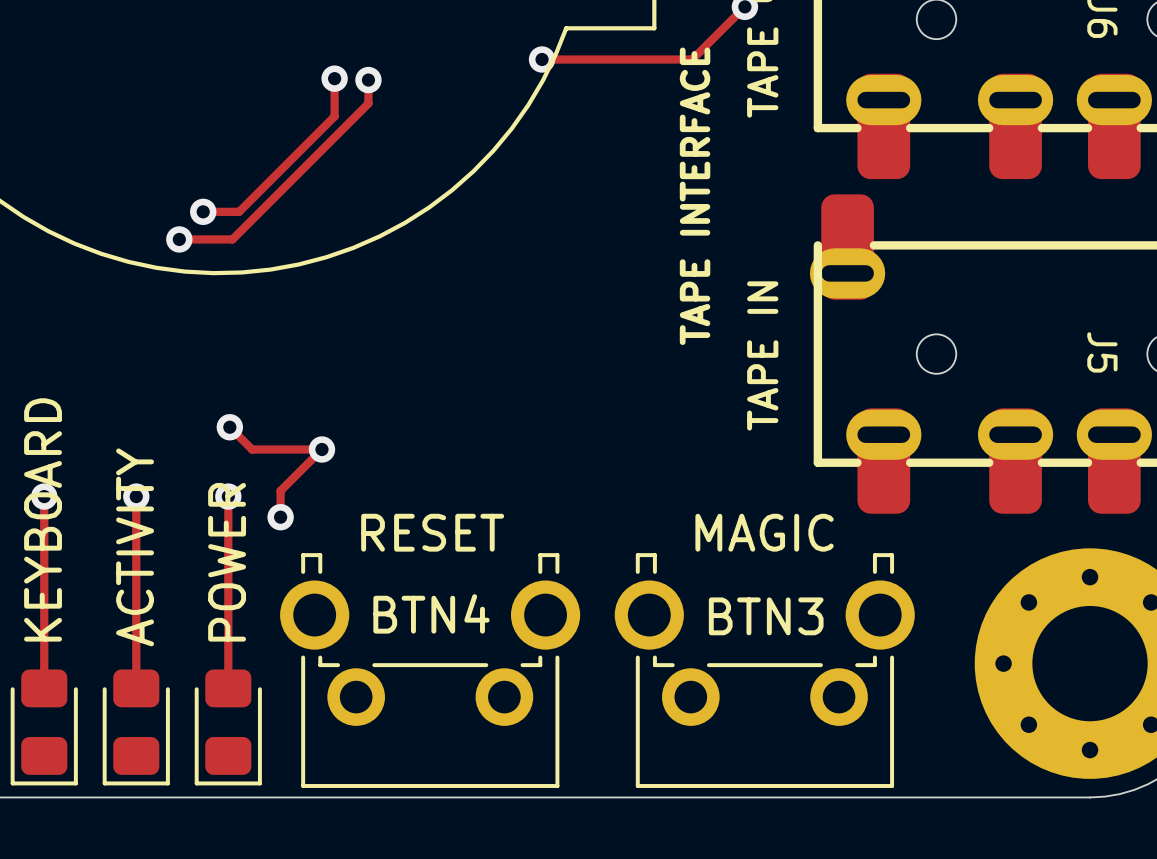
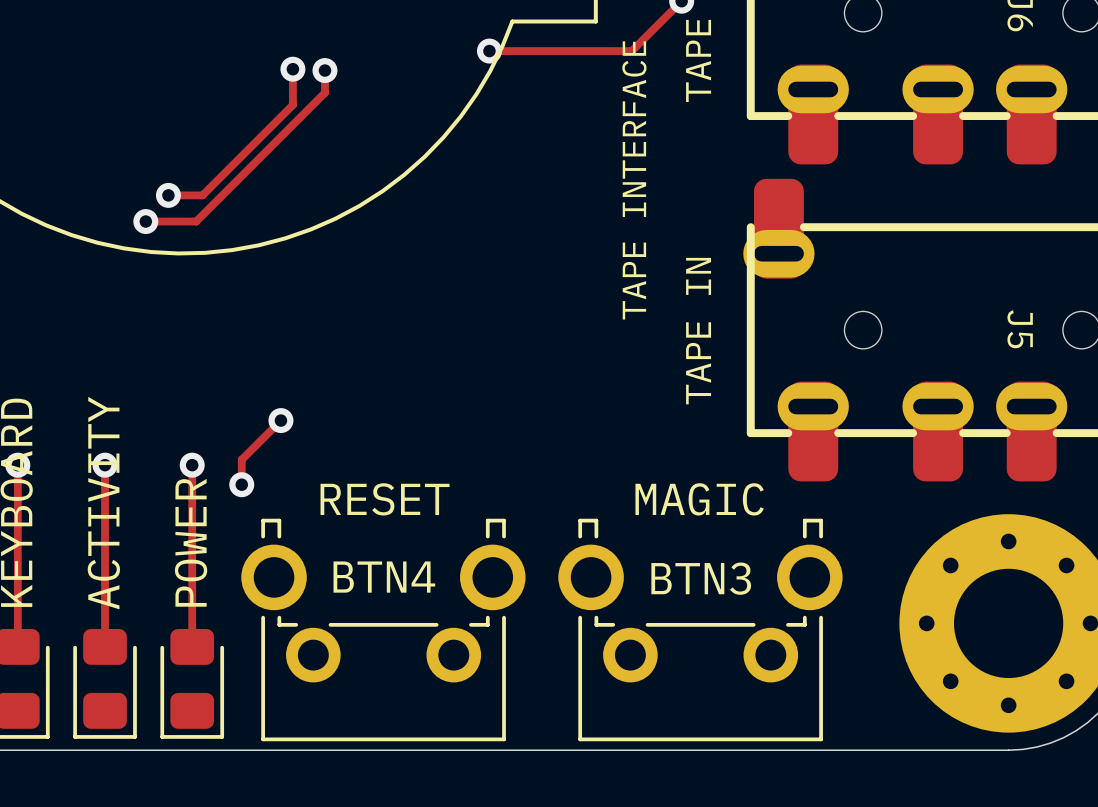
track: (229, 427) (252, 449) (321, 449) -> none
via: (229, 427) -> none

